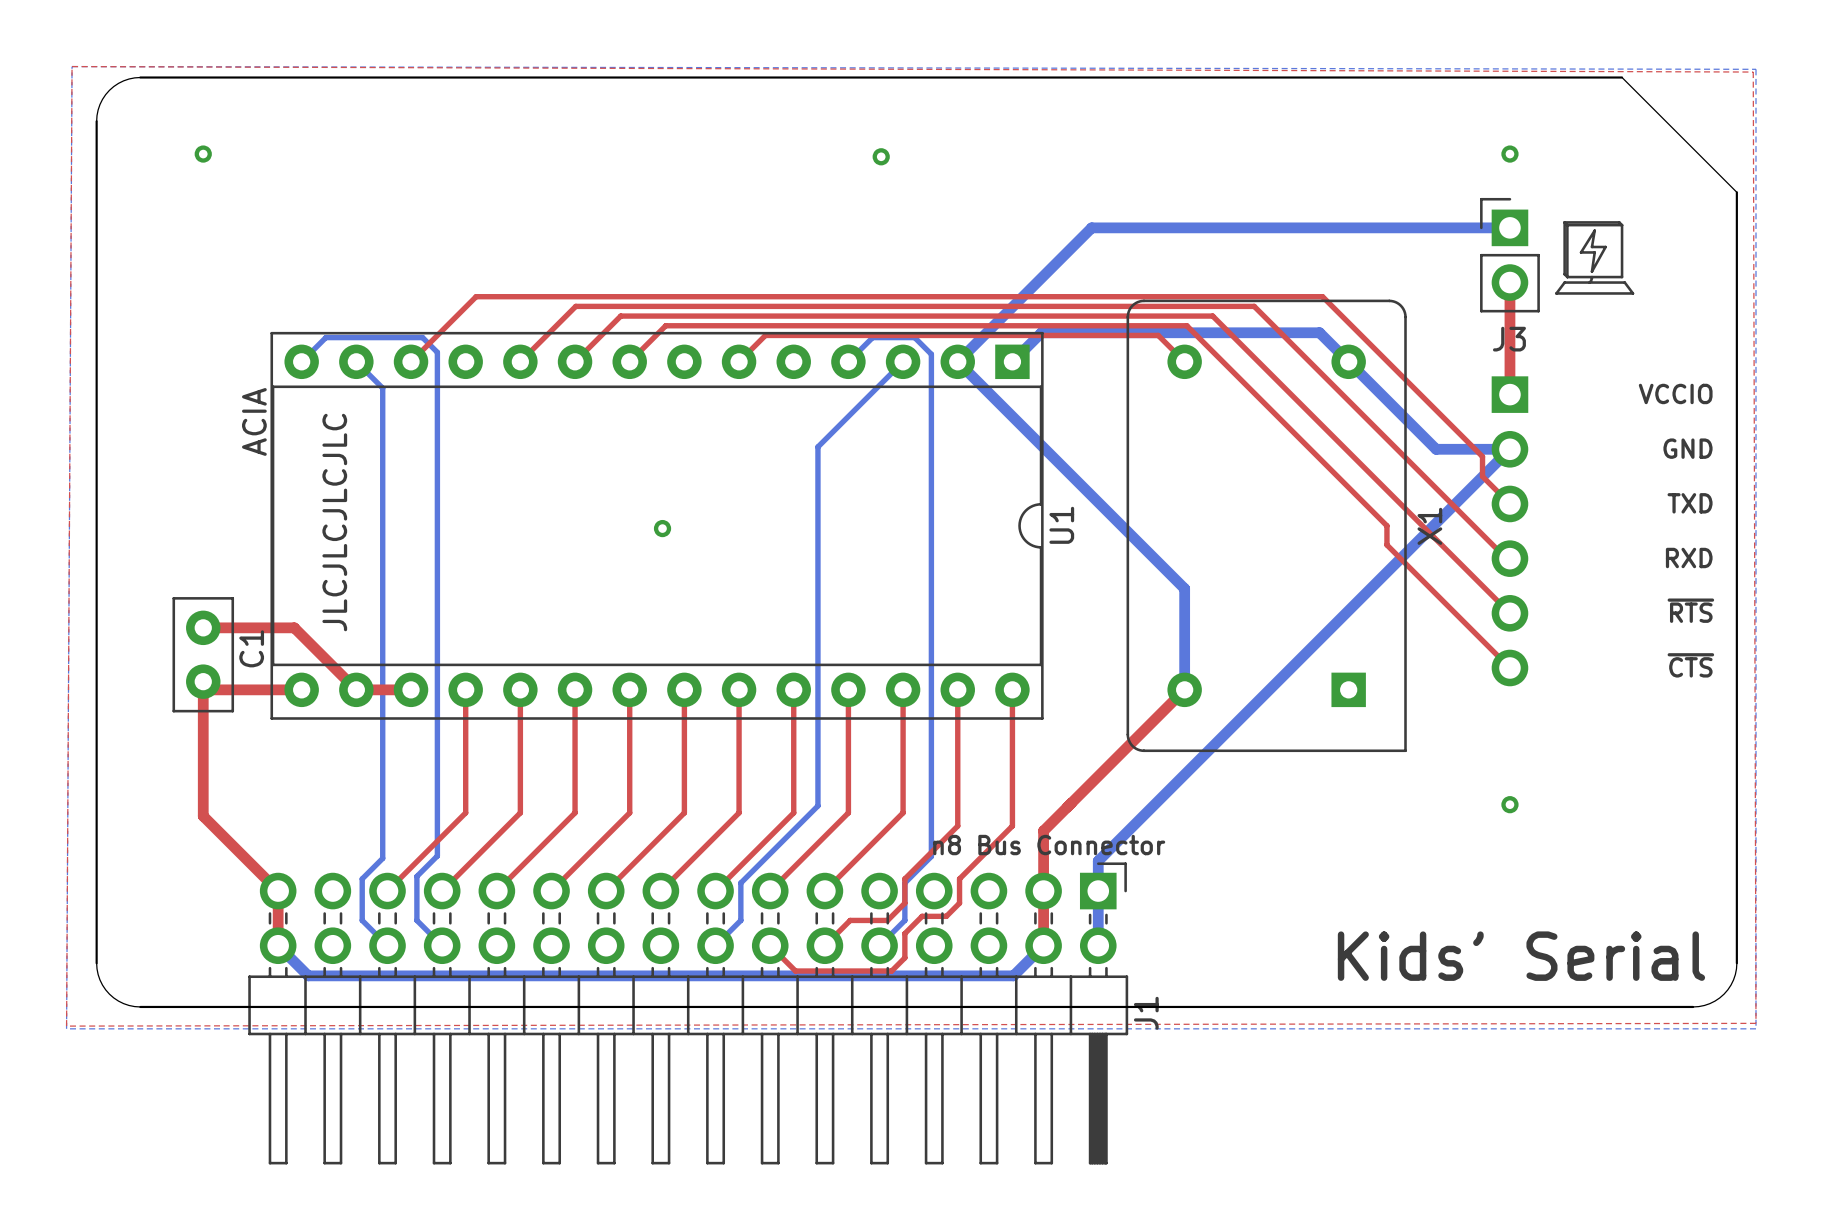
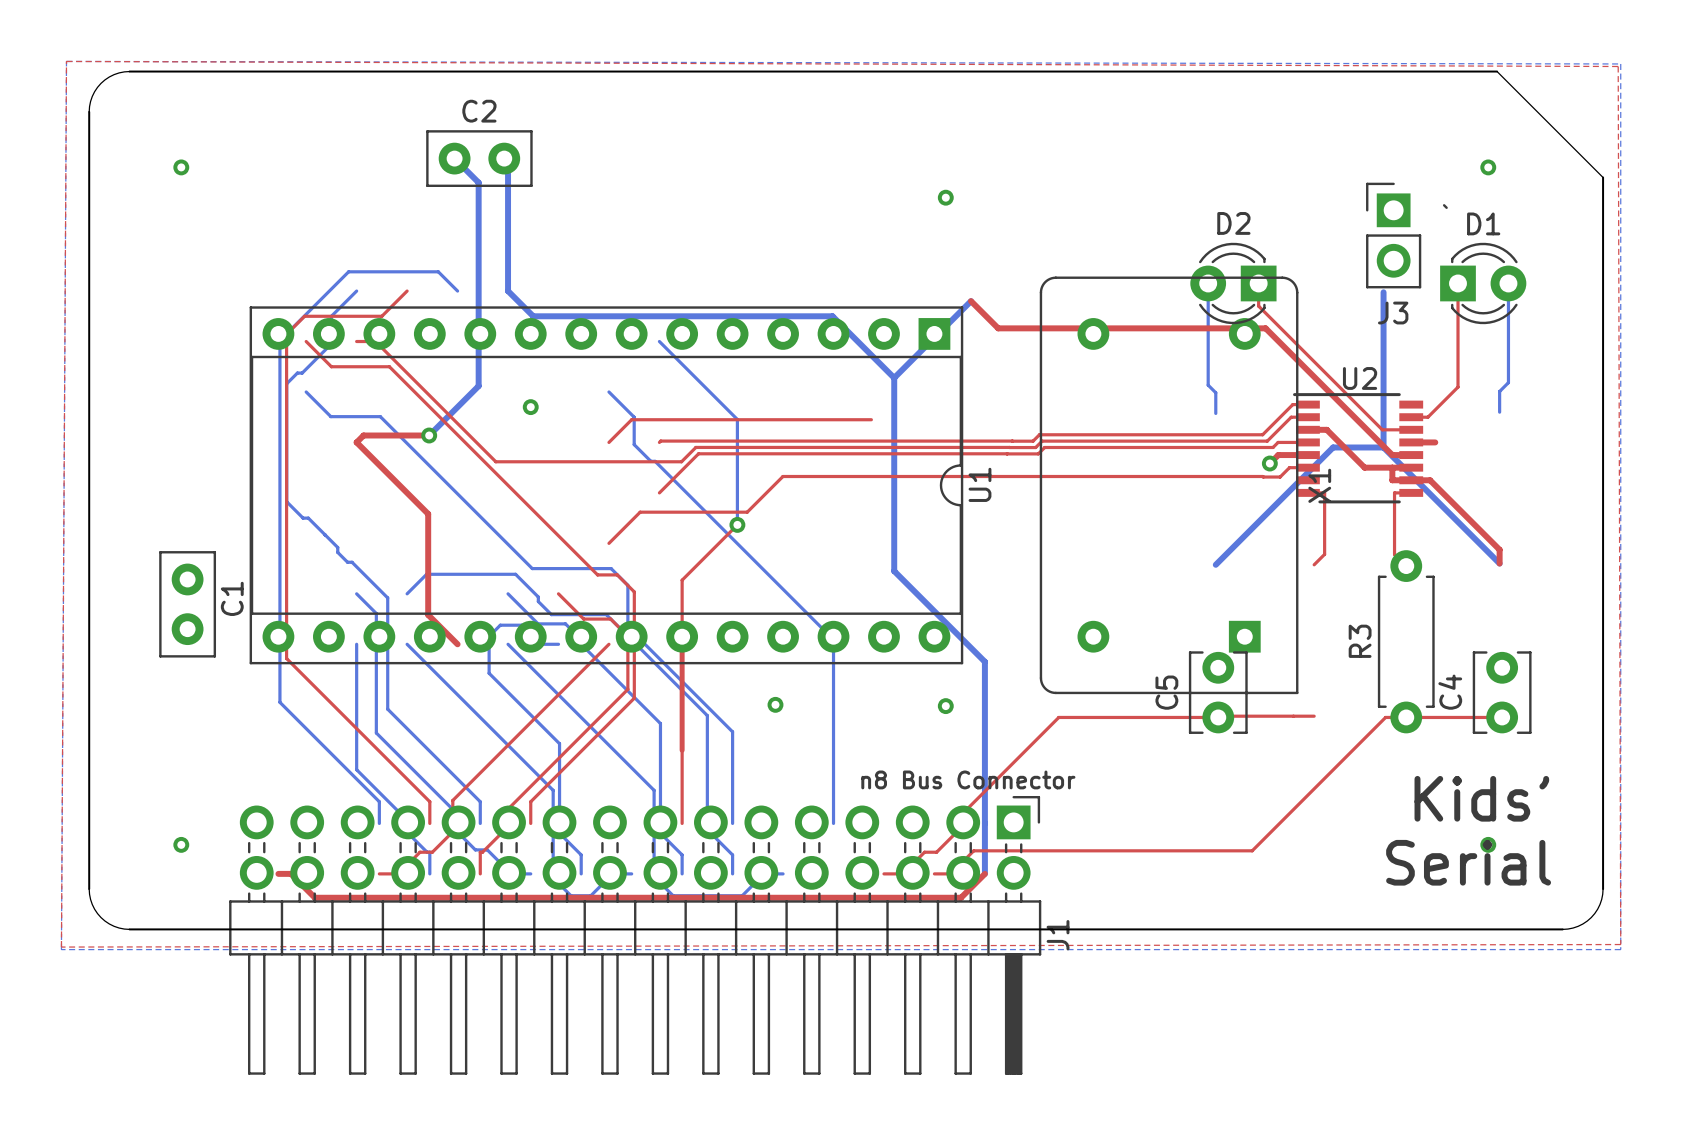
via position: (203, 154) -> (181, 167)
via position: (1509, 154) -> (1488, 167)
via: (881, 156) -> none
bottom track: none -> (454, 158) (478, 182) (478, 386) (428, 436)
C2: none -> (479, 158)
bottom track: none -> (504, 158) (508, 162) (508, 291) (533, 316) (832, 316) (894, 377)
via: none -> (945, 197)
line: (1622, 225) (1619, 222) (1564, 222) (1564, 274) (1567, 277) -> none
line: (1622, 225) (1567, 225) (1567, 277) -> none
line: (1622, 225) (1622, 277) (1567, 277) -> none
bottom track: (1509, 227) (1091, 227) (957, 361) (1184, 588) (1184, 689) -> none
line: (1594, 230) (1591, 247) (1605, 247) (1591, 271) (1594, 252) (1581, 252) (1594, 230) -> none
line: (1591, 277) (1589, 282) -> none
line: (1564, 282) (1624, 282) (1632, 293) (1556, 293) (1564, 282) -> none
top track: (1509, 285) (1509, 394) -> none
bottom track: none -> (1208, 283) (1208, 385) (1215, 392) (1215, 413)
D2: none -> (1233, 283)
top track: none -> (1258, 283) (1258, 306) (1382, 429) (1411, 429)
top track: none -> (1458, 283) (1458, 387) (1427, 417) (1411, 417)
D1: none -> (1483, 283)
bottom track: none -> (1508, 283) (1508, 382) (1499, 391) (1499, 412)
bottom track: none -> (356, 291) (331, 316) (331, 343) (302, 373) (297, 373) (286, 383) (286, 501) (303, 518) (308, 518) (337, 547) (337, 552) (347, 562) (352, 562) (387, 597) (387, 709) (480, 801) (480, 823)
top track: none -> (407, 291) (381, 316) (304, 316) (286, 334) (286, 658) (429, 801) (429, 823)
bottom track: none -> (457, 291) (438, 271) (348, 271) (279, 340) (279, 702) (379, 801) (379, 823)
bottom track: none -> (1383, 292) (1383, 447)
top track: none -> (971, 301) (998, 328) (1265, 328) (1392, 455) (1411, 455)
bottom track: none -> (971, 301) (894, 377)
bottom track: (301, 361) (325, 337) (422, 337) (437, 352) (437, 855) (416, 876) (416, 920) (442, 945) -> none
bottom track: (356, 361) (382, 388) (382, 858) (362, 878) (362, 920) (387, 945) -> none
top track: (411, 361) (476, 296) (1322, 296) (1482, 456) (1482, 476) (1509, 503) -> none
top track: (520, 361) (575, 306) (1254, 306) (1506, 558) (1509, 558) -> none
top track: (575, 361) (620, 316) (1212, 316) (1509, 613) -> none
top track: (629, 361) (665, 325) (1186, 325) (1386, 525) (1386, 544) (1509, 667) -> none
top track: (739, 361) (765, 335) (1158, 335) (1184, 361) -> none
bottom track: (848, 361) (872, 337) (914, 337) (931, 354) (931, 856) (904, 883) (904, 920) (879, 945) -> none
bottom track: (903, 361) (817, 446) (817, 805) (740, 883) (740, 920) (715, 945) -> none
bottom track: (1012, 361) (1041, 332) (1319, 332) (1436, 449) (1509, 449) (1098, 860) (1098, 945) -> none
top track: none -> (306, 341) (331, 366) (389, 366) (597, 574) (617, 574) (634, 591) (634, 698) (530, 801) (530, 823)
top track: none -> (356, 341) (375, 341) (495, 461) (681, 461) (695, 447) (1009, 447)
bottom track: none -> (659, 341) (737, 419) (737, 524)
text: VCCIO (1675, 393) -> none
bottom track: none -> (894, 377) (894, 571) (984, 661) (984, 873)
text: ACIA (254, 421) -> none
bottom track: none -> (306, 391) (330, 416) (380, 416) (532, 568) (611, 568) (627, 585) (627, 627) (732, 731) (732, 823)
bottom track: none -> (608, 391) (634, 417) (634, 444) (650, 461) (655, 461) (833, 639) (833, 823)
top track: none -> (1307, 404) (1292, 404) (1262, 434) (1039, 434) (1033, 441) (1012, 441)
via: none -> (530, 407)
text: GND (1687, 448) -> none
top track: none -> (1307, 417) (1291, 417) (1267, 441) (1042, 441) (1035, 447) (1009, 447)
top track: none -> (871, 419) (631, 419) (608, 442)
top track: none -> (1307, 429) (1326, 429) (1364, 467) (1411, 467)
top track: none -> (429, 435) (363, 435) (356, 442) (428, 513) (428, 614) (457, 644)
via: none -> (429, 435)
top track: none -> (1012, 441) (659, 442)
top track: none -> (1307, 442) (1278, 442) (1273, 447) (1044, 447) (1038, 453) (1007, 453)
top track: none -> (1411, 442) (1435, 442)
bottom track: none -> (1383, 447) (1499, 563)
bottom track: none -> (1383, 447) (1333, 447) (1215, 564)
U2: none -> (1358, 448)
top track: none -> (1007, 453) (698, 453) (659, 492)
top track: none -> (1307, 455) (1278, 455) (1269, 463)
via: none -> (1269, 463)
text: TXD (1690, 503) -> none
top track: none -> (1307, 467) (1289, 467) (1280, 477) (782, 476) (747, 512) (640, 512) (608, 543)
top track: none -> (1392, 467) (1392, 480) (1430, 480) (1499, 549) (1499, 563)
text: JLCJLCJLCJLC (334, 522) -> none
via: (662, 528) -> none
part: (1509, 531) -> none
top track: none -> (1307, 492) (1324, 492) (1324, 554) (1314, 564)
top track: none -> (1411, 492) (1394, 492) (1394, 554) (1406, 566)
text: RXD (1689, 557) -> none
top track: none -> (737, 524) (682, 580) (682, 636)
via: none -> (737, 524)
text: ~{RTS} (1690, 610) -> none
top track: (203, 627) (294, 627) (356, 689) (411, 689) -> none
bottom track: none -> (356, 593) (376, 613) (376, 733) (458, 815) (458, 833) (475, 849) (487, 849) (511, 873) (530, 873)
bottom track: none -> (407, 593) (426, 574) (515, 574) (538, 597) (538, 601) (551, 614) (606, 614) (707, 715) (707, 829) (732, 854) (732, 873)
bottom track: none -> (508, 593) (538, 623) (565, 623) (577, 635) (577, 640) (660, 723) (660, 833) (682, 854) (682, 873)
top track: none -> (558, 593) (583, 619) (610, 619) (627, 636) (627, 689) (507, 809) (507, 826) (482, 852) (480, 852) (480, 873)
text: ~{CTS} (1690, 665) -> none
top track: (301, 689) (211, 689) (203, 681) (203, 816) (278, 891) (278, 945) -> none
top track: (465, 689) (465, 812) (387, 891) -> none
top track: (520, 689) (520, 812) (442, 891) -> none
top track: (575, 689) (575, 812) (496, 891) -> none
top track: (629, 689) (629, 812) (551, 891) -> none
top track: (684, 689) (684, 812) (606, 891) -> none
top track: (793, 689) (793, 812) (715, 891) -> none
top track: (848, 689) (848, 812) (770, 891) -> none
top track: (903, 689) (903, 812) (824, 891) -> none
top track: (957, 689) (957, 826) (904, 878) (904, 903) (887, 920) (850, 920) (824, 945) -> none
top track: (1012, 689) (1012, 826) (959, 878) (959, 903) (946, 916) (922, 916) (904, 933) (904, 957) (891, 971) (795, 971) (770, 945) -> none
top track: (1184, 689) (1043, 830) (1043, 945) -> none
R3: none -> (1406, 641)
bottom track: none -> (356, 644) (356, 769) (408, 821) (408, 833) (427, 852) (429, 852) (429, 873)
bottom track: none -> (407, 644) (553, 790) (553, 877) (570, 895) (590, 895) (612, 873) (631, 873)
bottom track: none -> (508, 644) (654, 790) (654, 876) (673, 895) (742, 895) (764, 873) (783, 873)
bottom track: none -> (558, 644) (540, 644) (521, 625) (500, 625) (489, 636) (489, 673) (559, 743) (559, 833) (581, 854) (581, 873)
top track: none -> (608, 644) (452, 800) (452, 831) (432, 852) (419, 852) (398, 873) (379, 873)
C5: none -> (1218, 692)
C4: none -> (1502, 692)
via: none -> (775, 704)
via: none -> (945, 706)
top track: none -> (1314, 716) (1058, 717) (959, 817) (959, 829) (936, 852) (924, 852) (902, 873) (883, 873)
top track: none -> (1502, 717) (1385, 717) (1252, 850) (973, 850) (950, 873) (934, 873)
via: (1509, 804) -> none
top track: (739, 812) (660, 891) -> (682, 750) (682, 823)
text: none -> Kids’ (1481, 798)
via: none -> (181, 844)
via: none -> (1488, 844)
bottom track: (278, 945) (308, 975) (1013, 975) (1043, 945) -> none
top track: none -> (278, 873) (291, 873) (314, 897) (961, 897) (984, 873)
text: Kids’ Serial (1521, 956) -> Serial (1468, 862)

